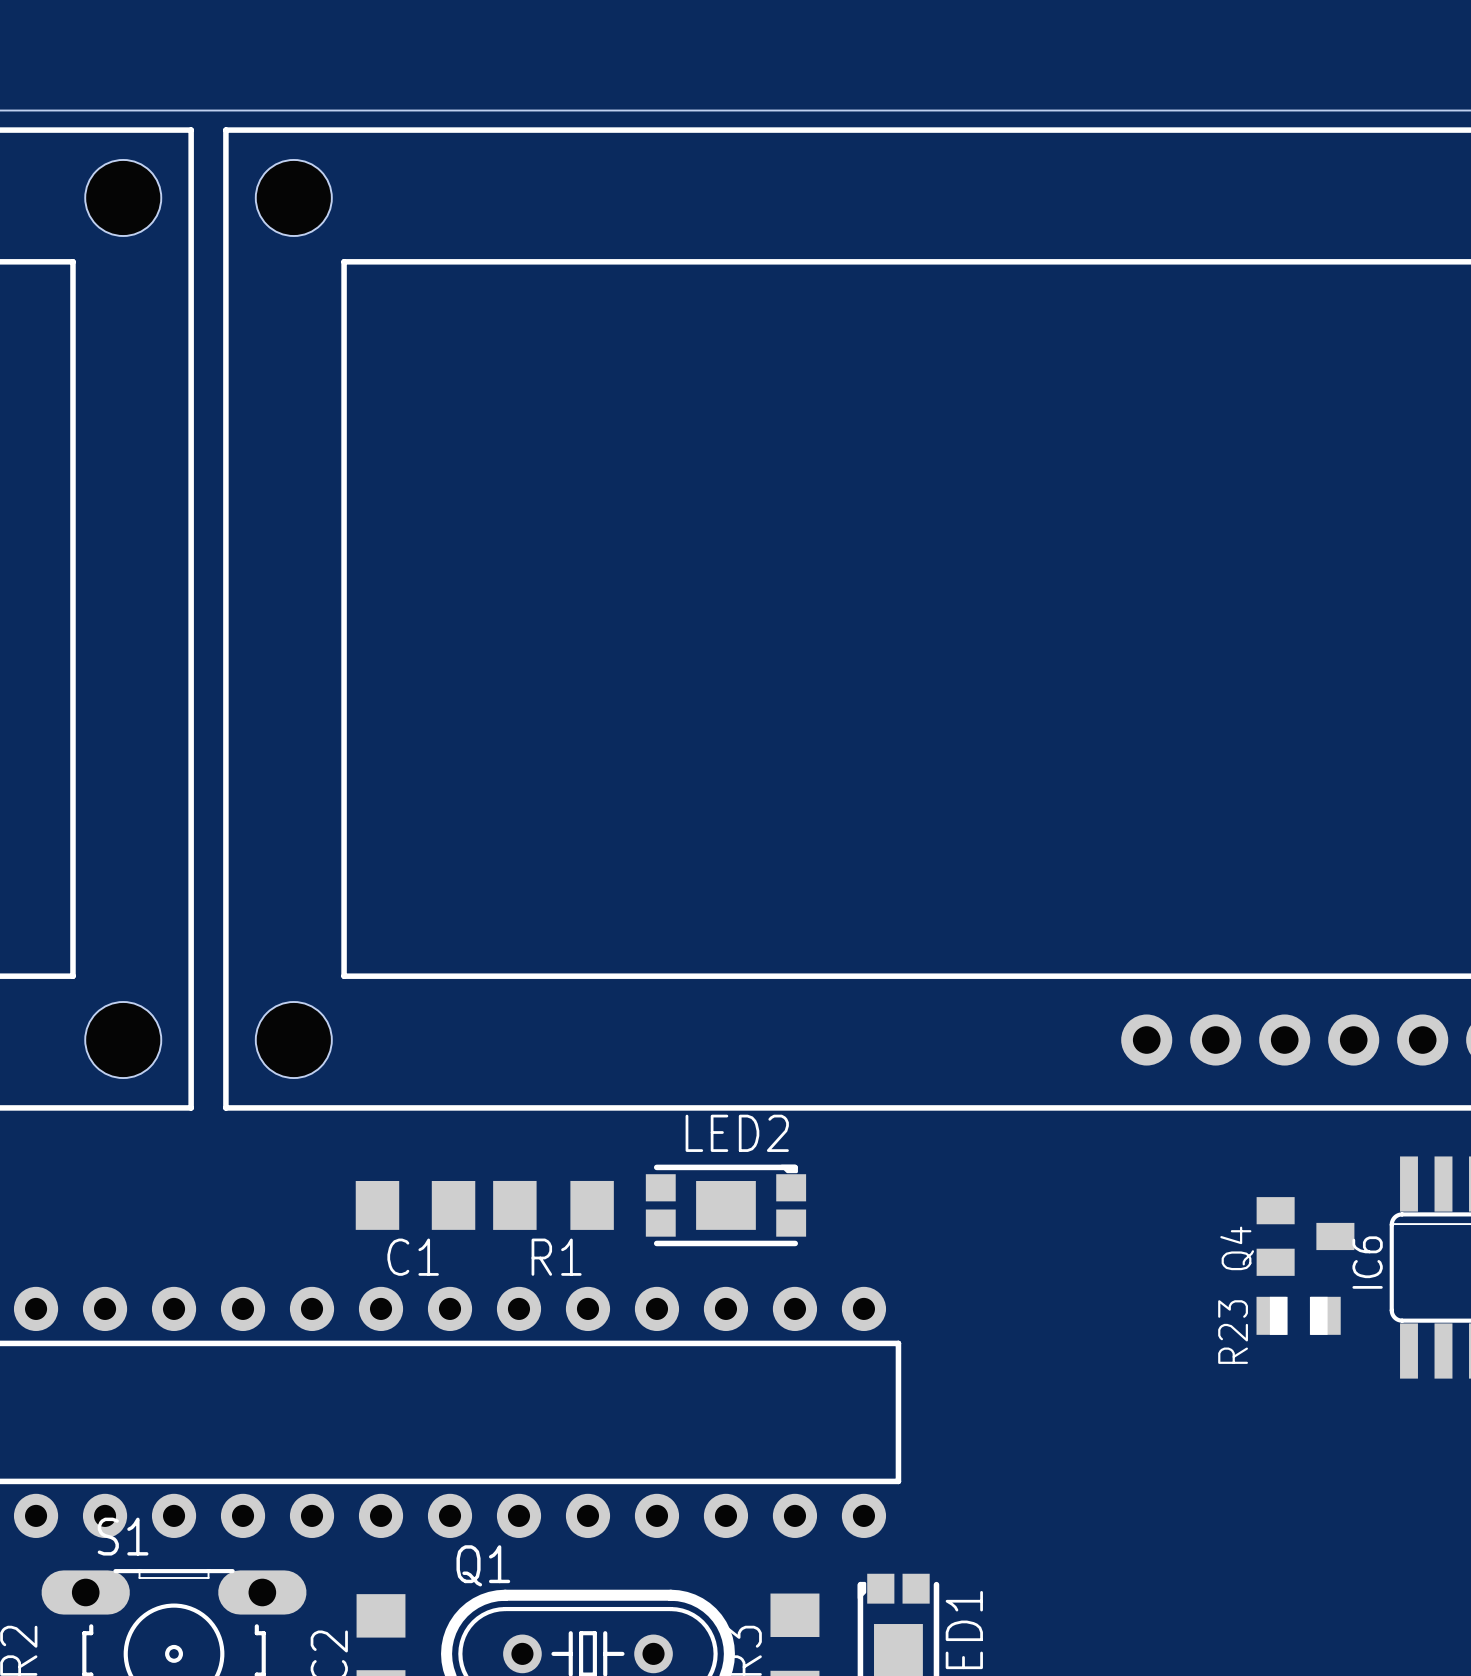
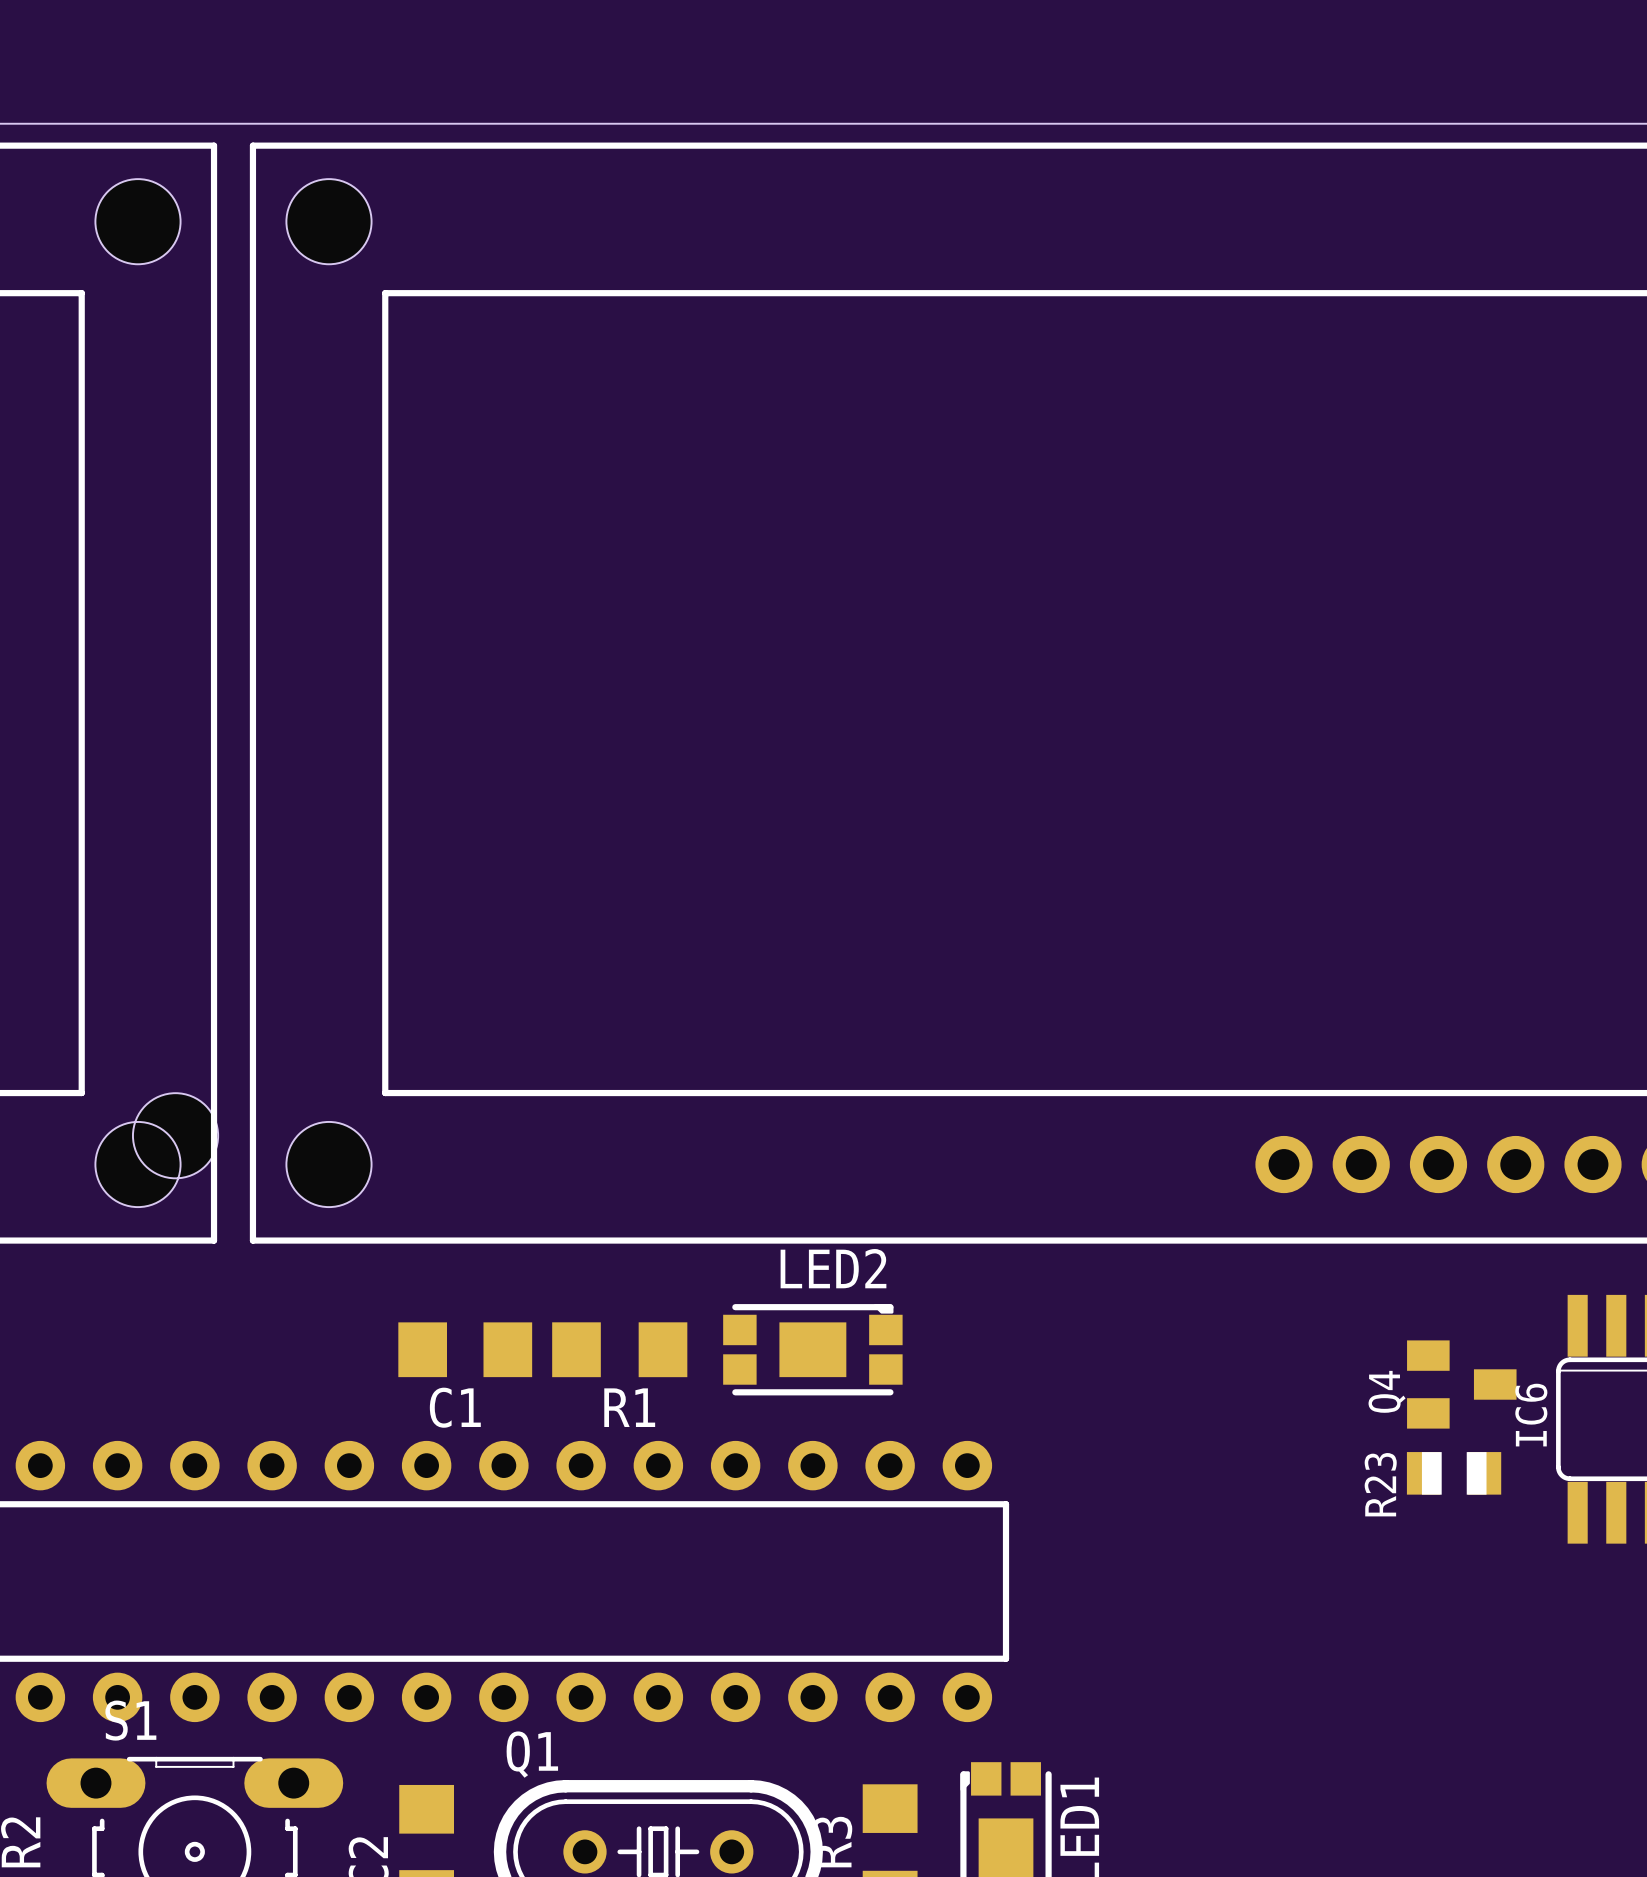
hole: none -> (175, 1135)

